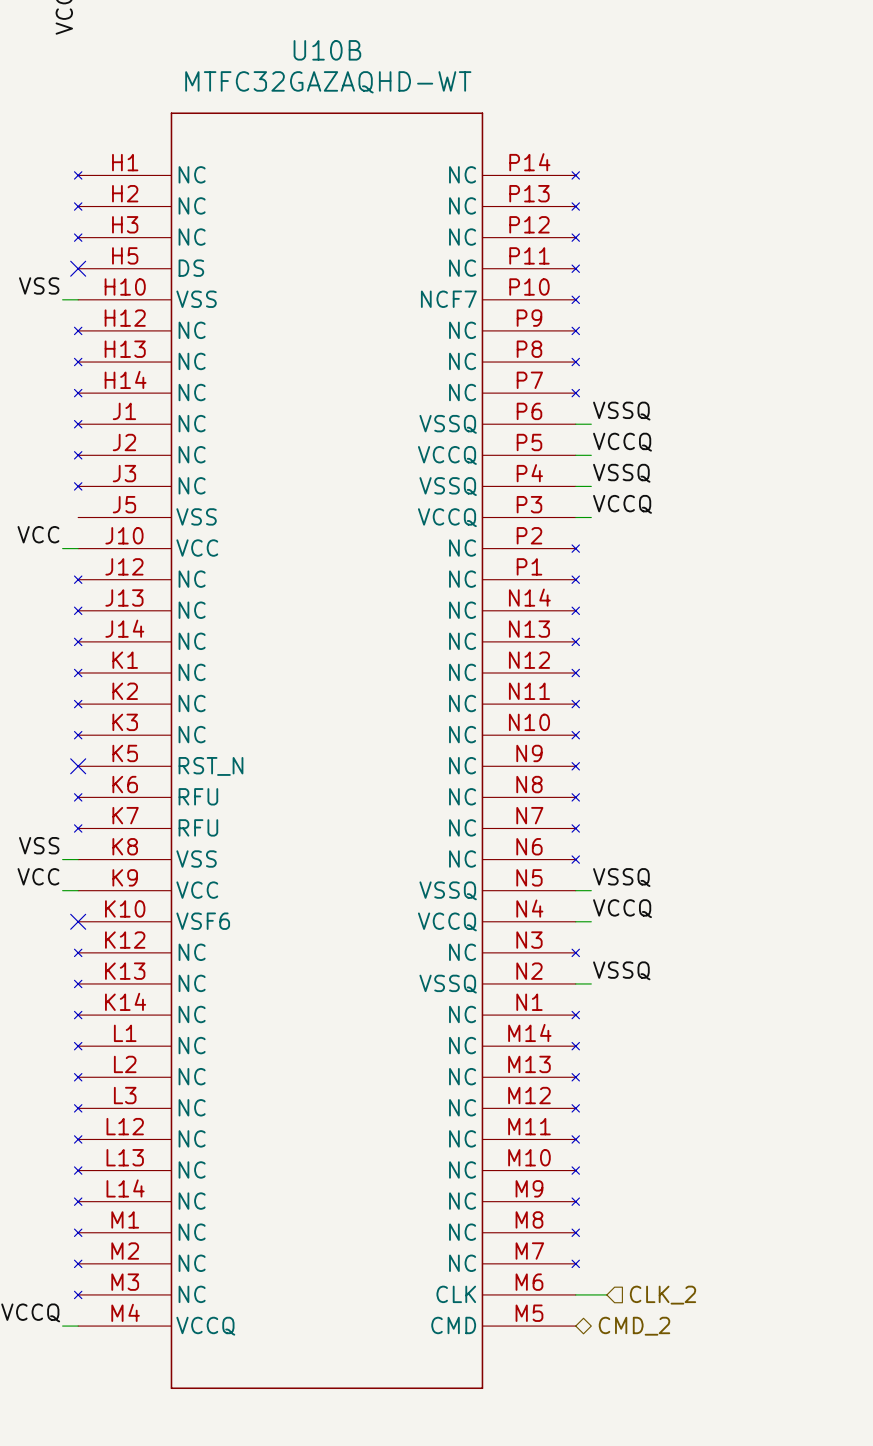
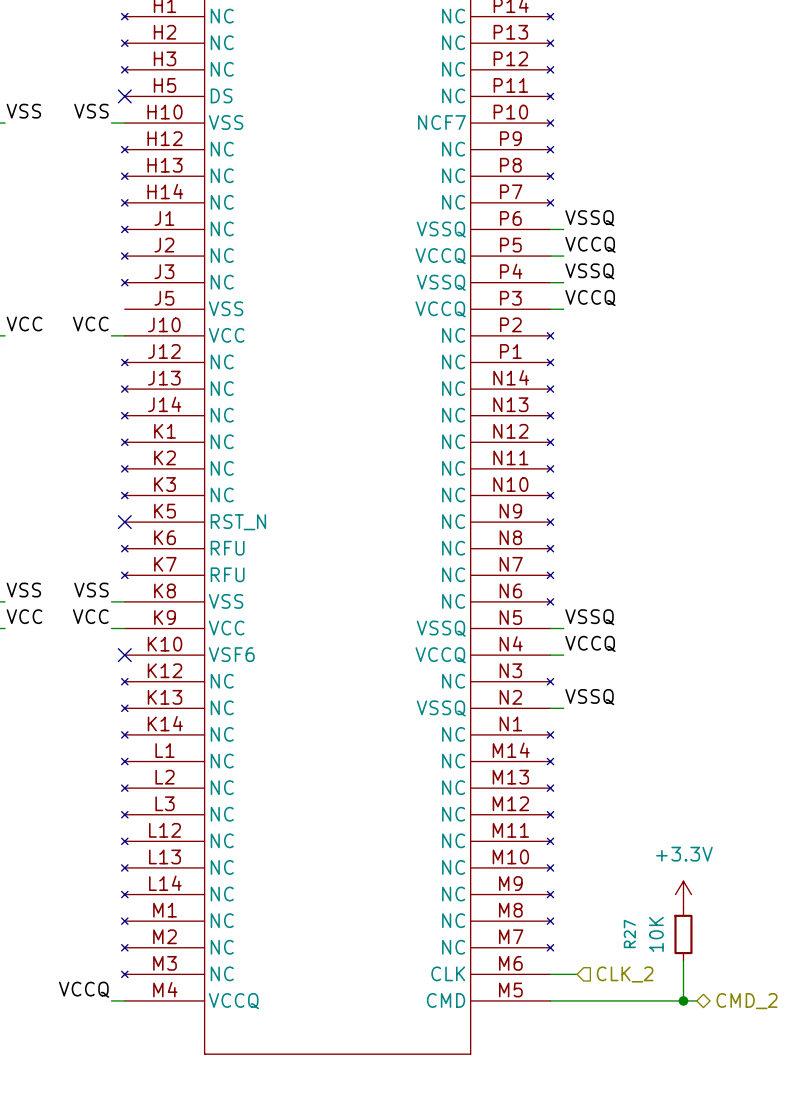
power symbol: none -> +3.3V (683, 894)
R27: none -> 10K (683, 934)
wire: none -> (683, 961) (683, 1000)
wire: none -> (550, 1000) (696, 1000)
hierarchical label position: CMD_2 (634, 1326) -> CMD_2 (747, 1001)
junction: none -> (683, 1000)

